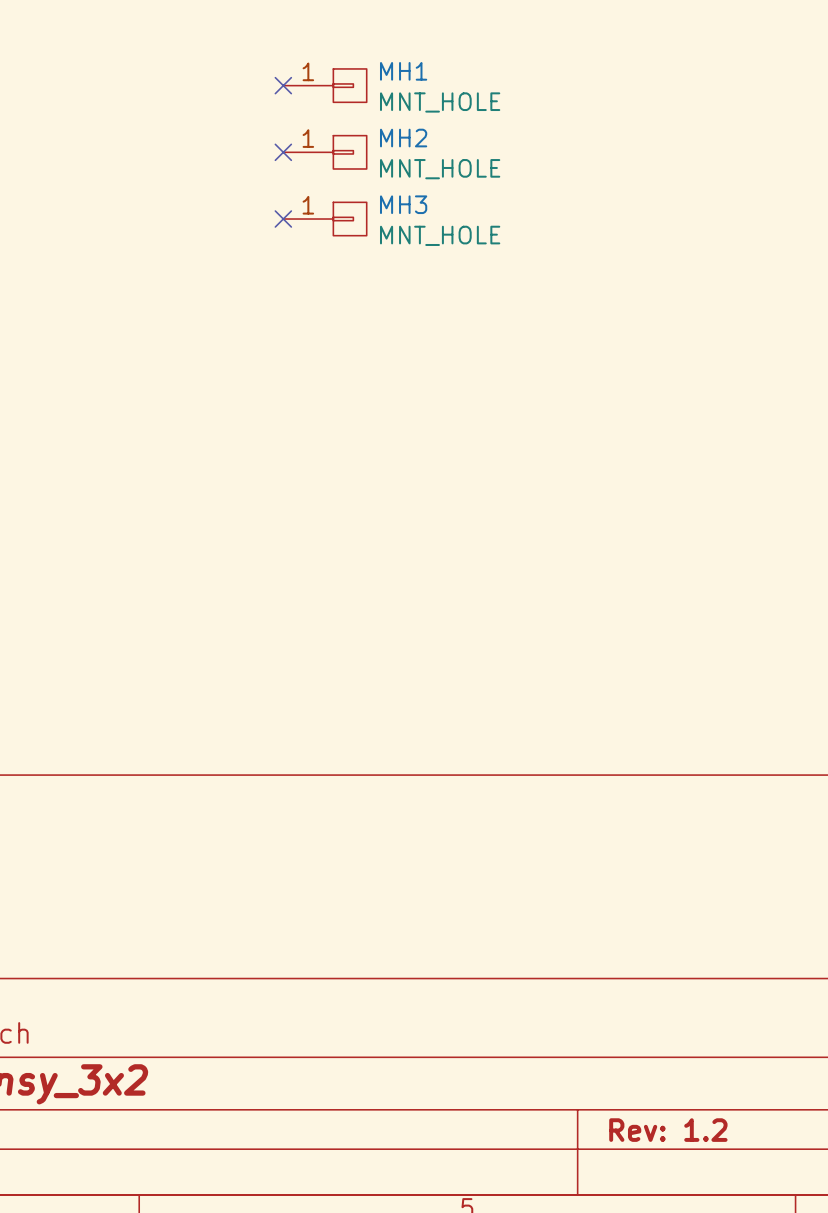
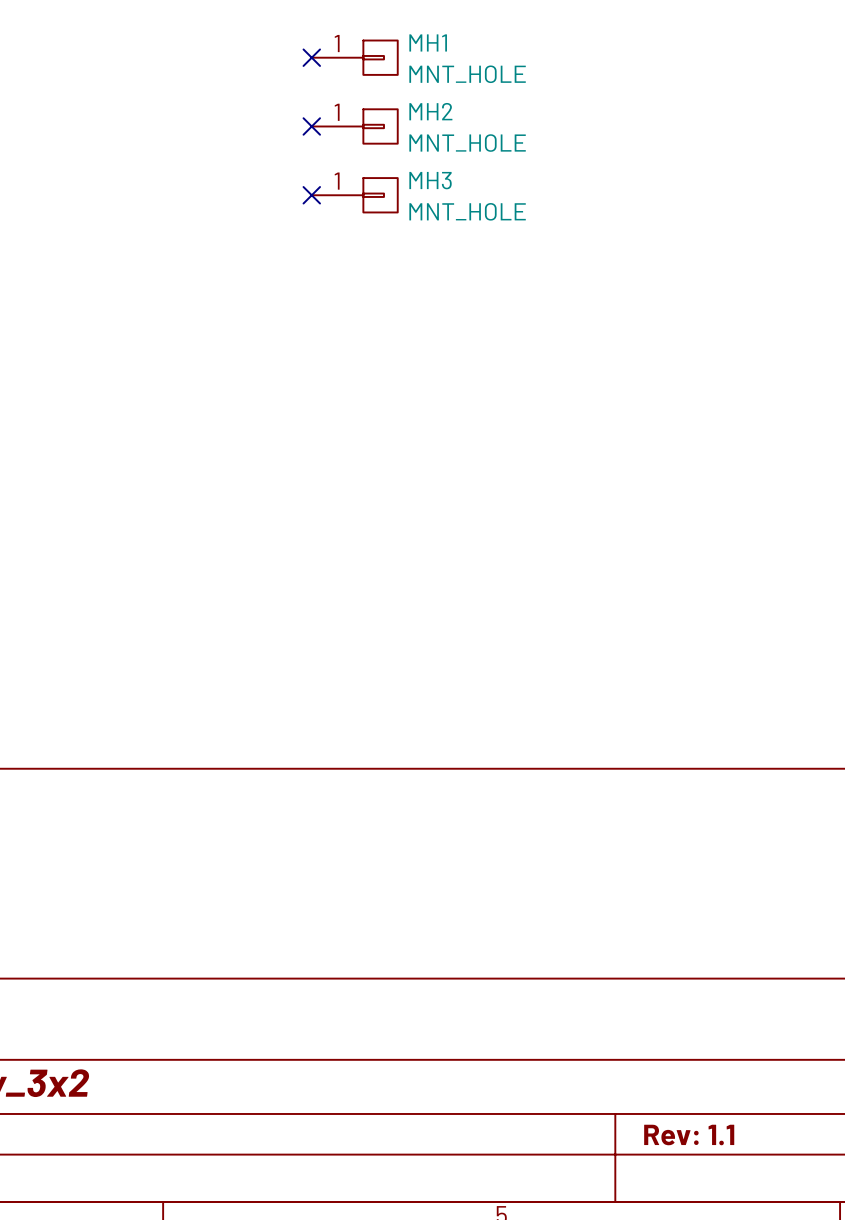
title block: Rev: 1.2 (668, 1130) -> Rev: 1.1 (689, 1135)

